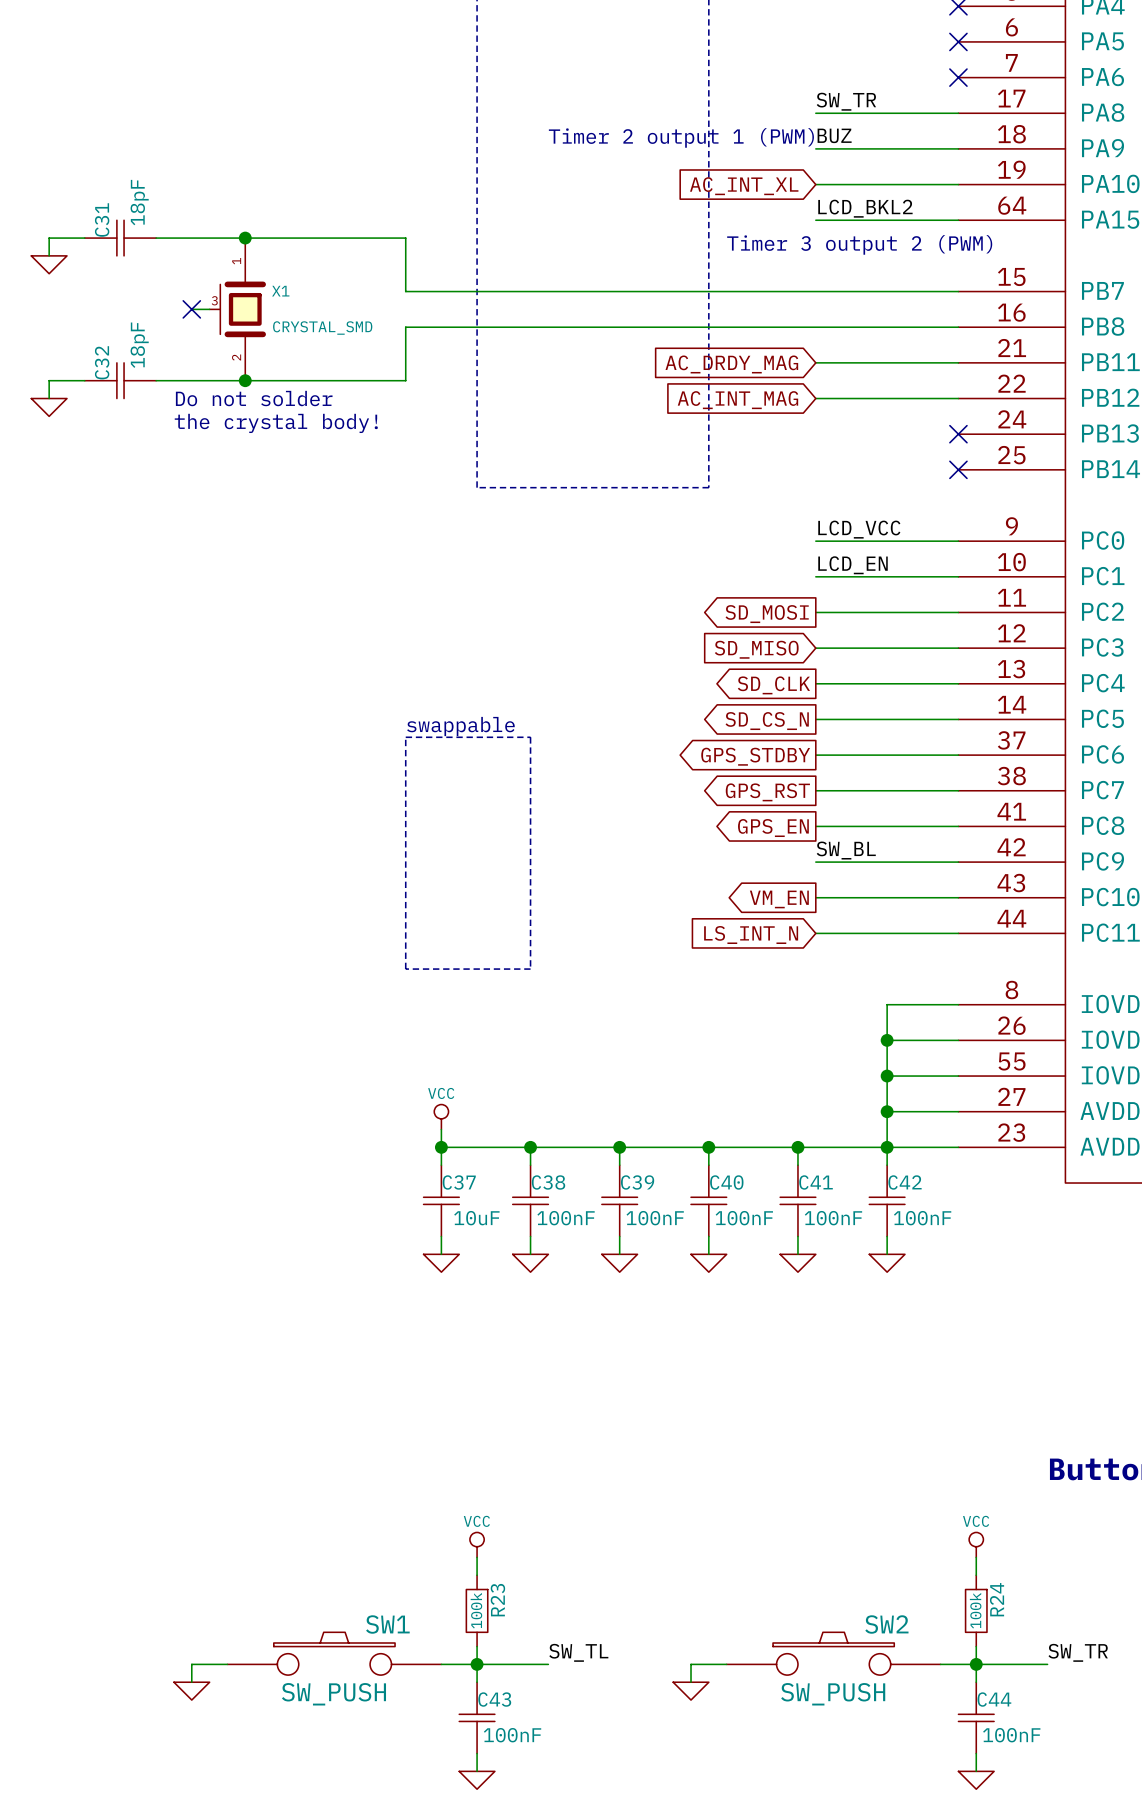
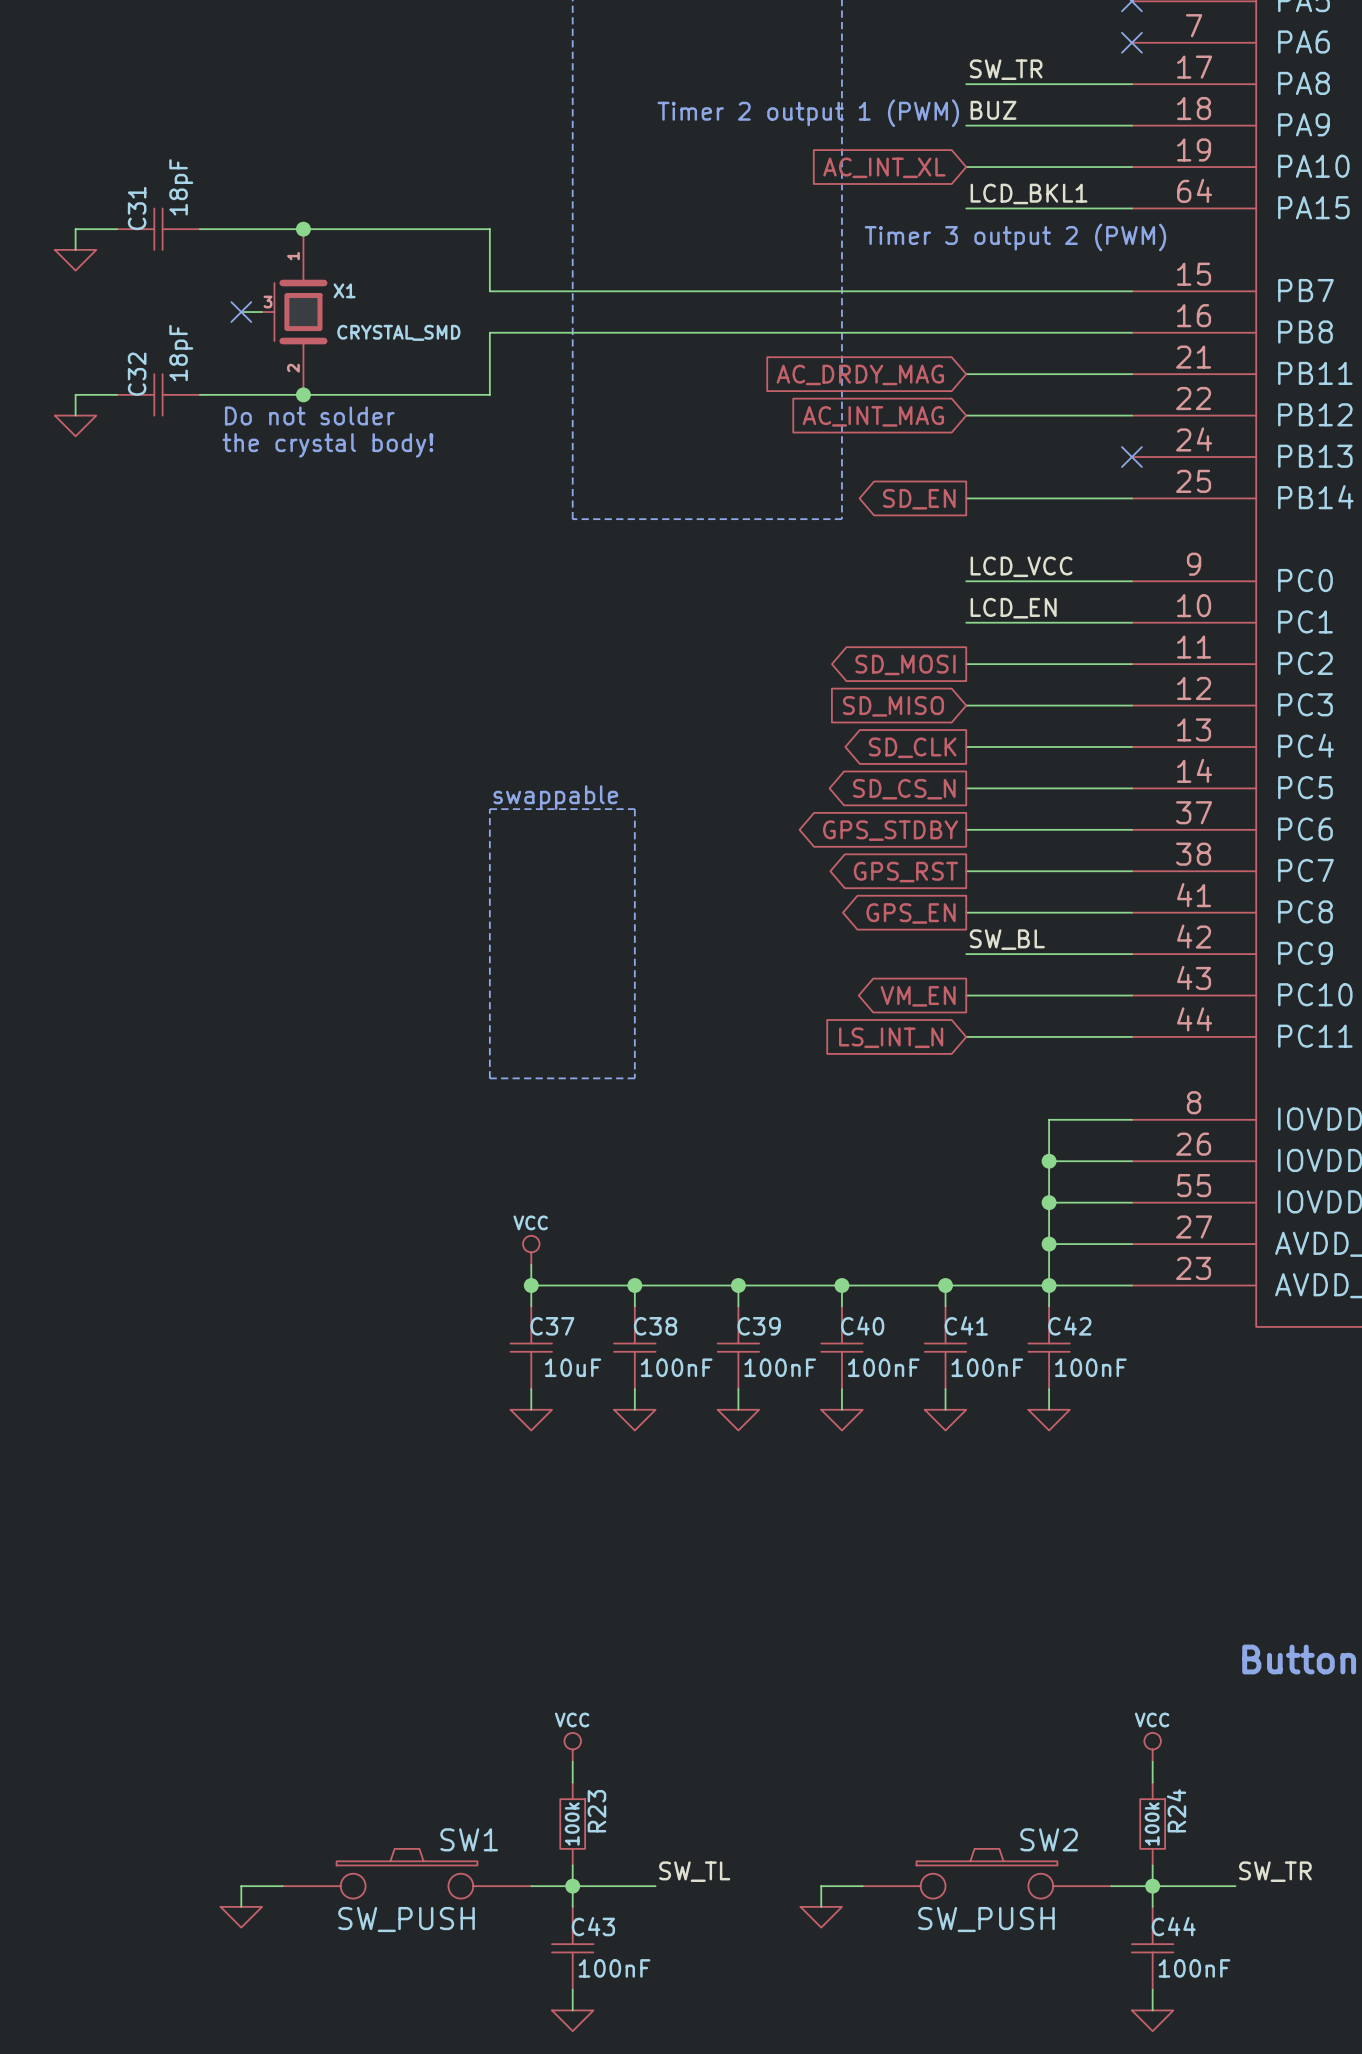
label: LCD_BKL2 (865, 208) -> LCD_BKL1 (1029, 193)
wire: none -> (966, 498) (1131, 498)
no-connect mark: (958, 469) -> none
global label: none -> SD_EN (919, 499)

